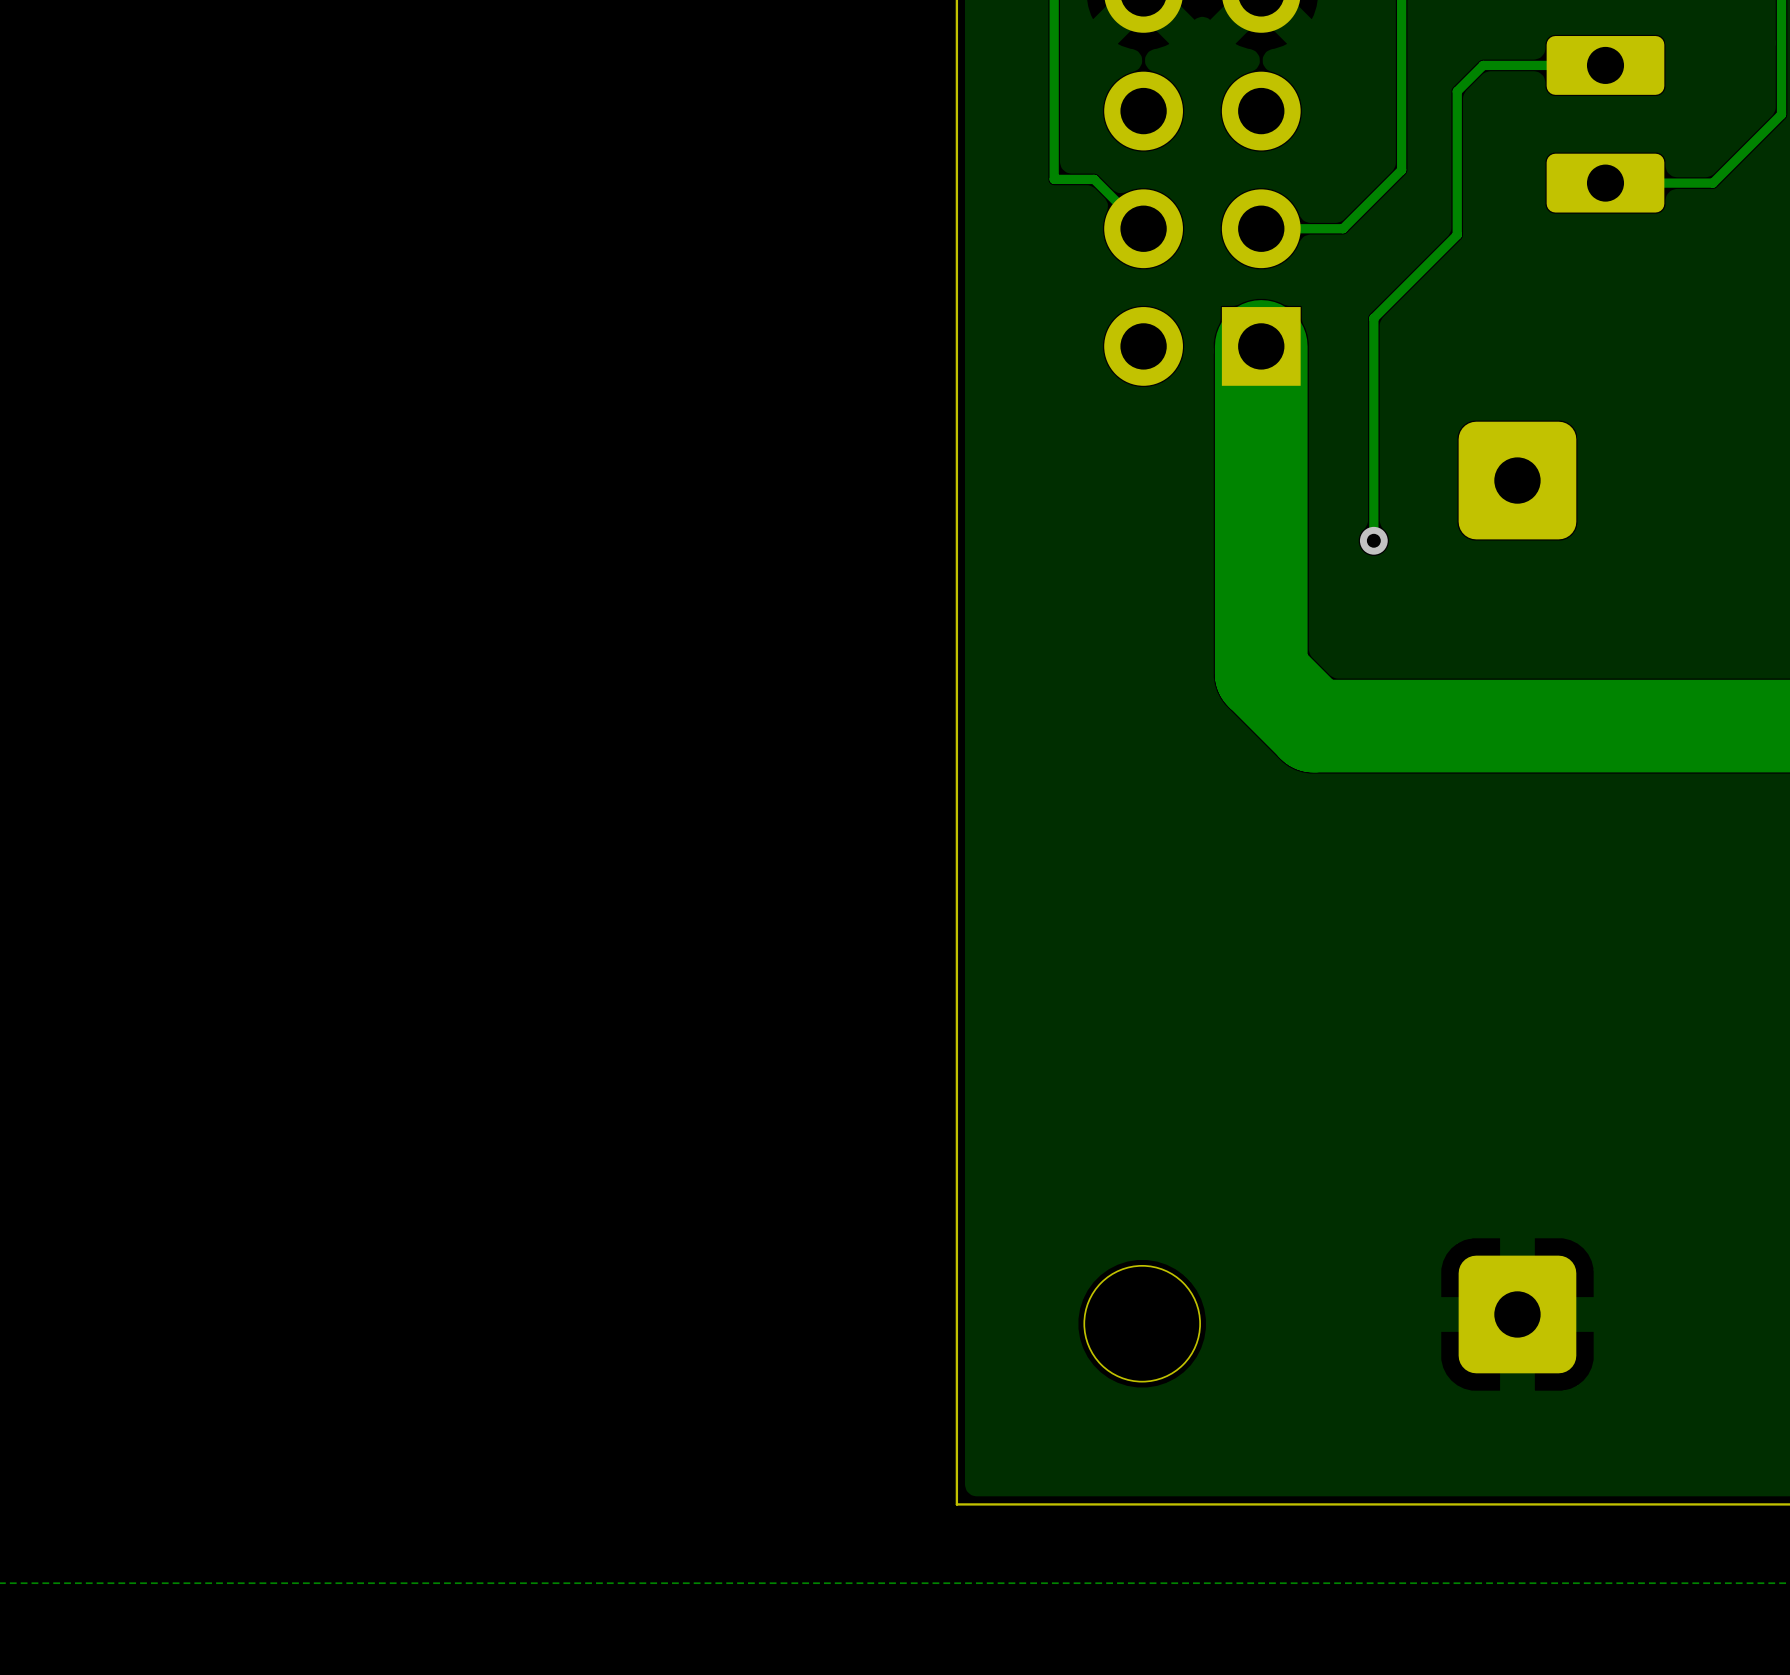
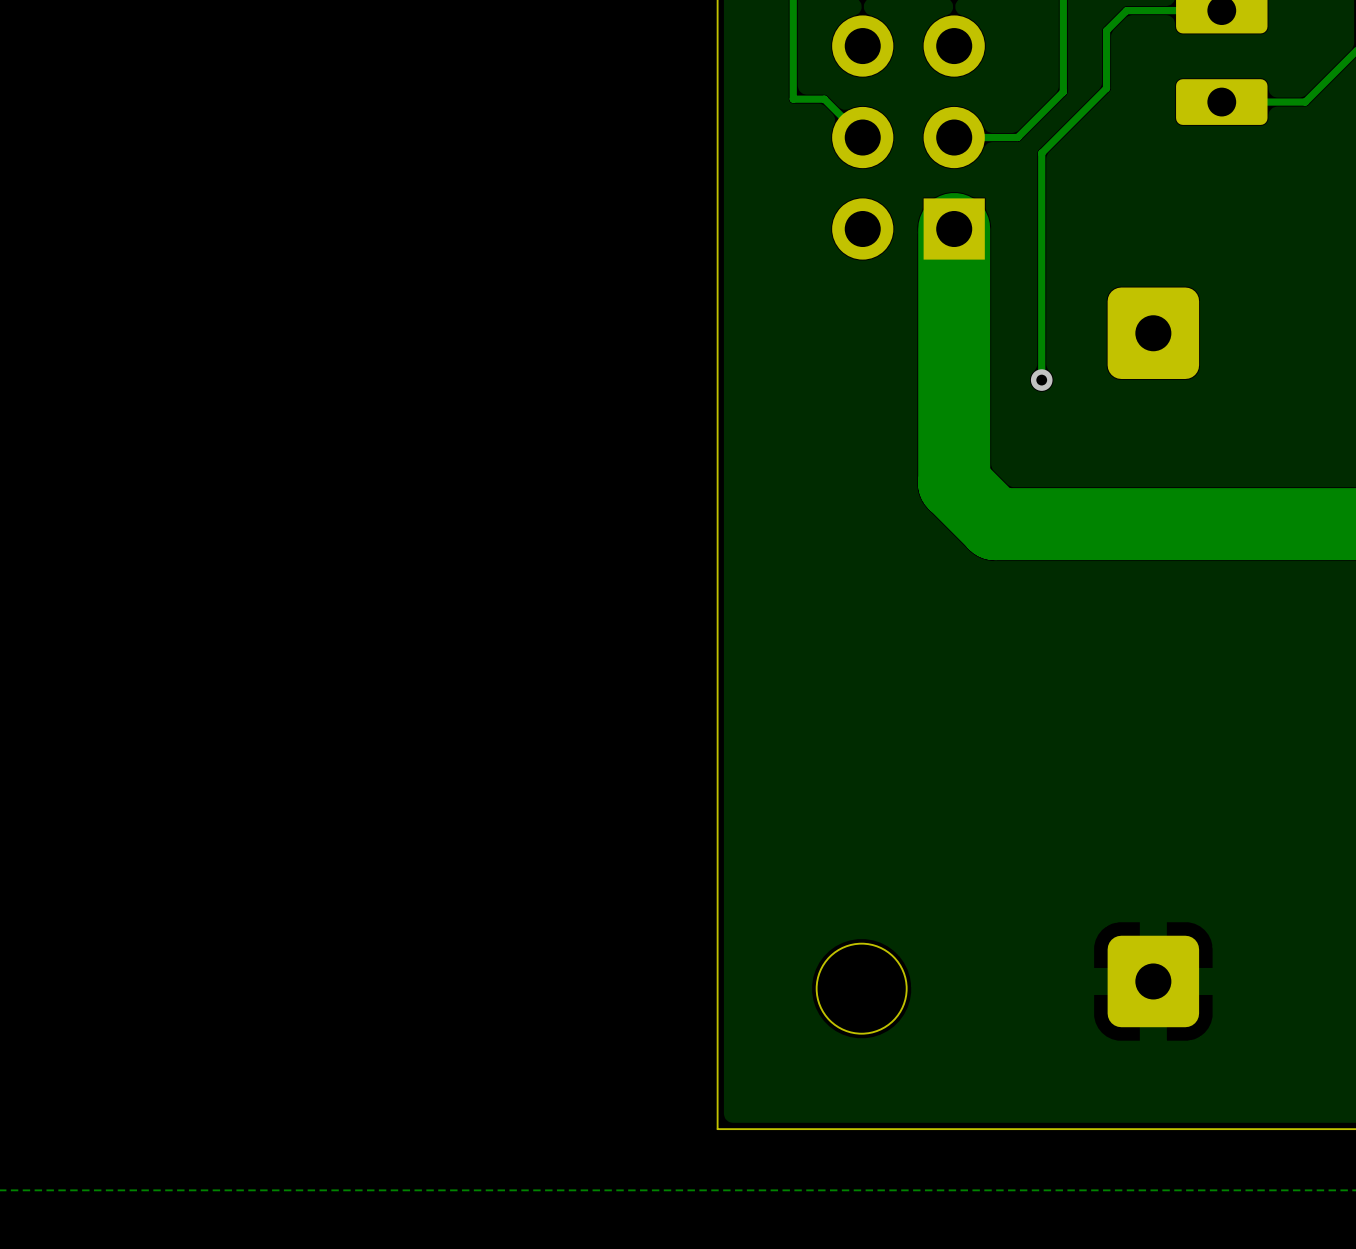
track: (1457, 165) (1457, 235) (1373, 318) -> (1106, 88) (1041, 153) (1041, 207)

